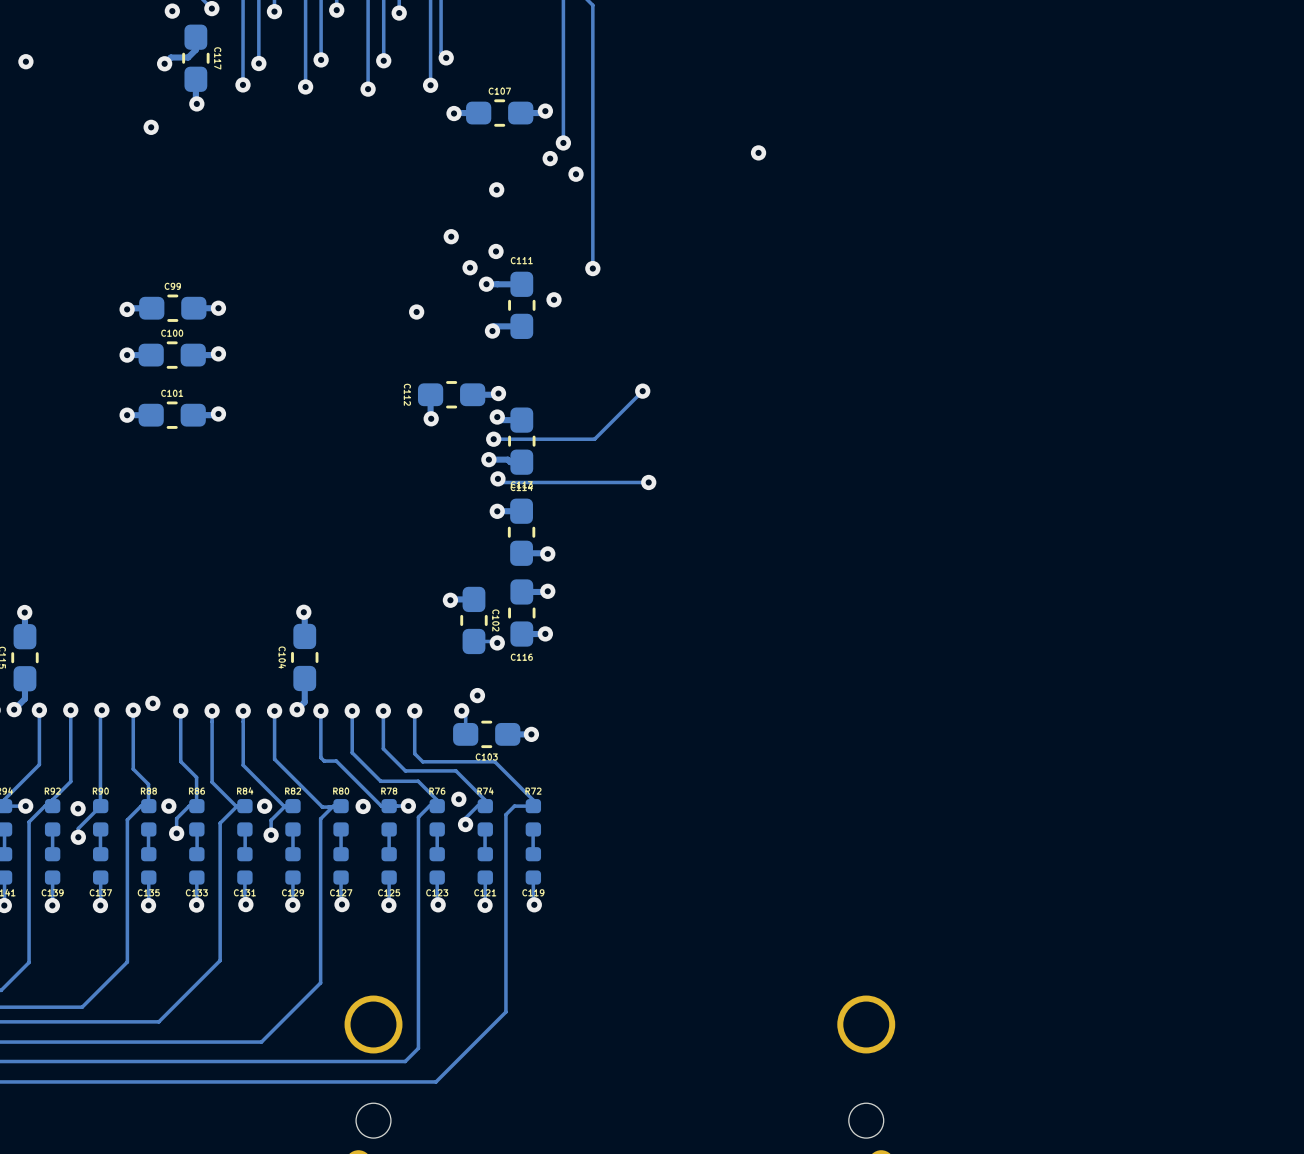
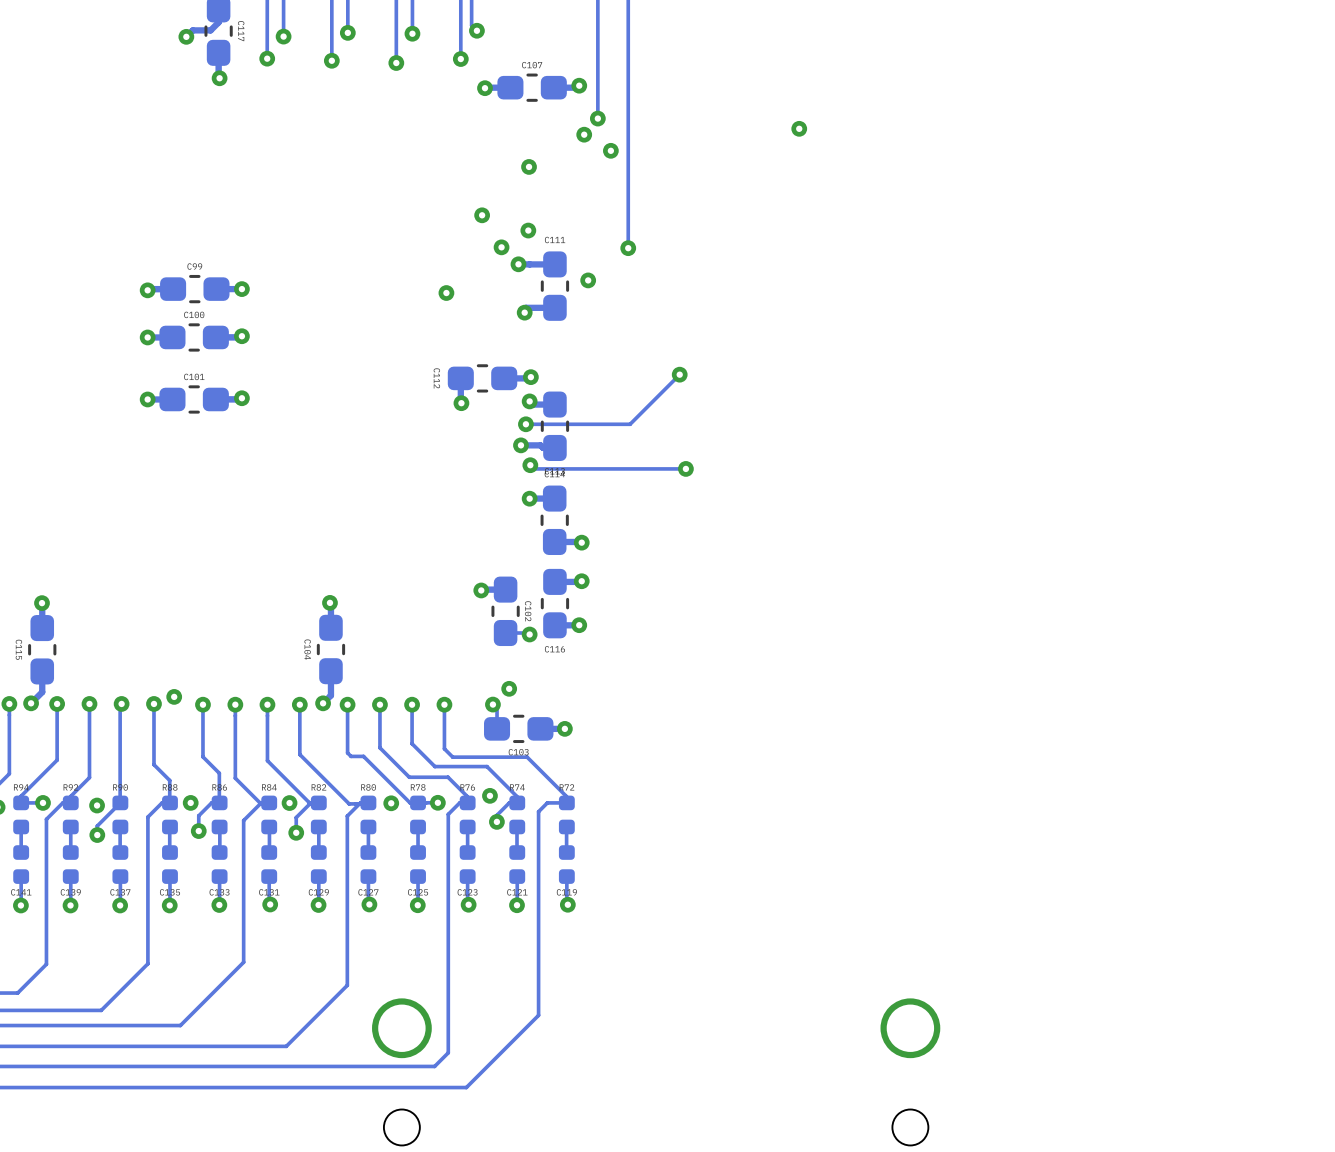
via: (25, 61) -> none
via: (151, 127) -> none

